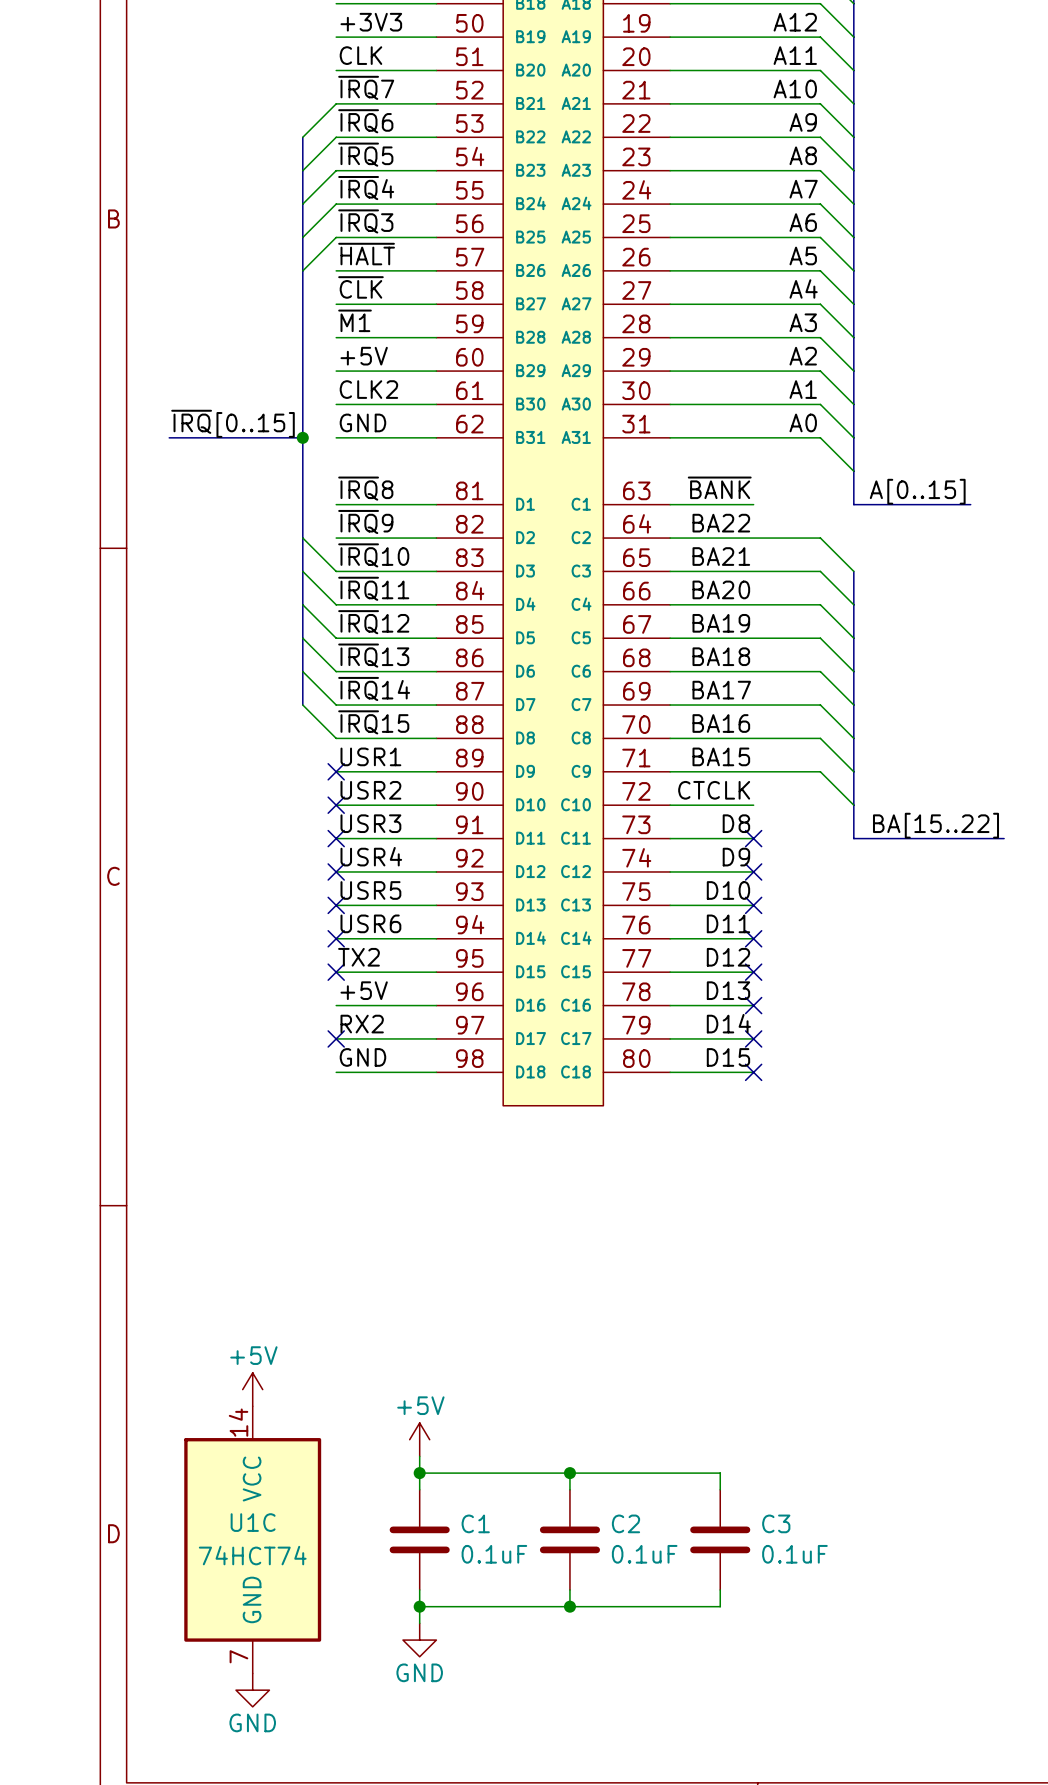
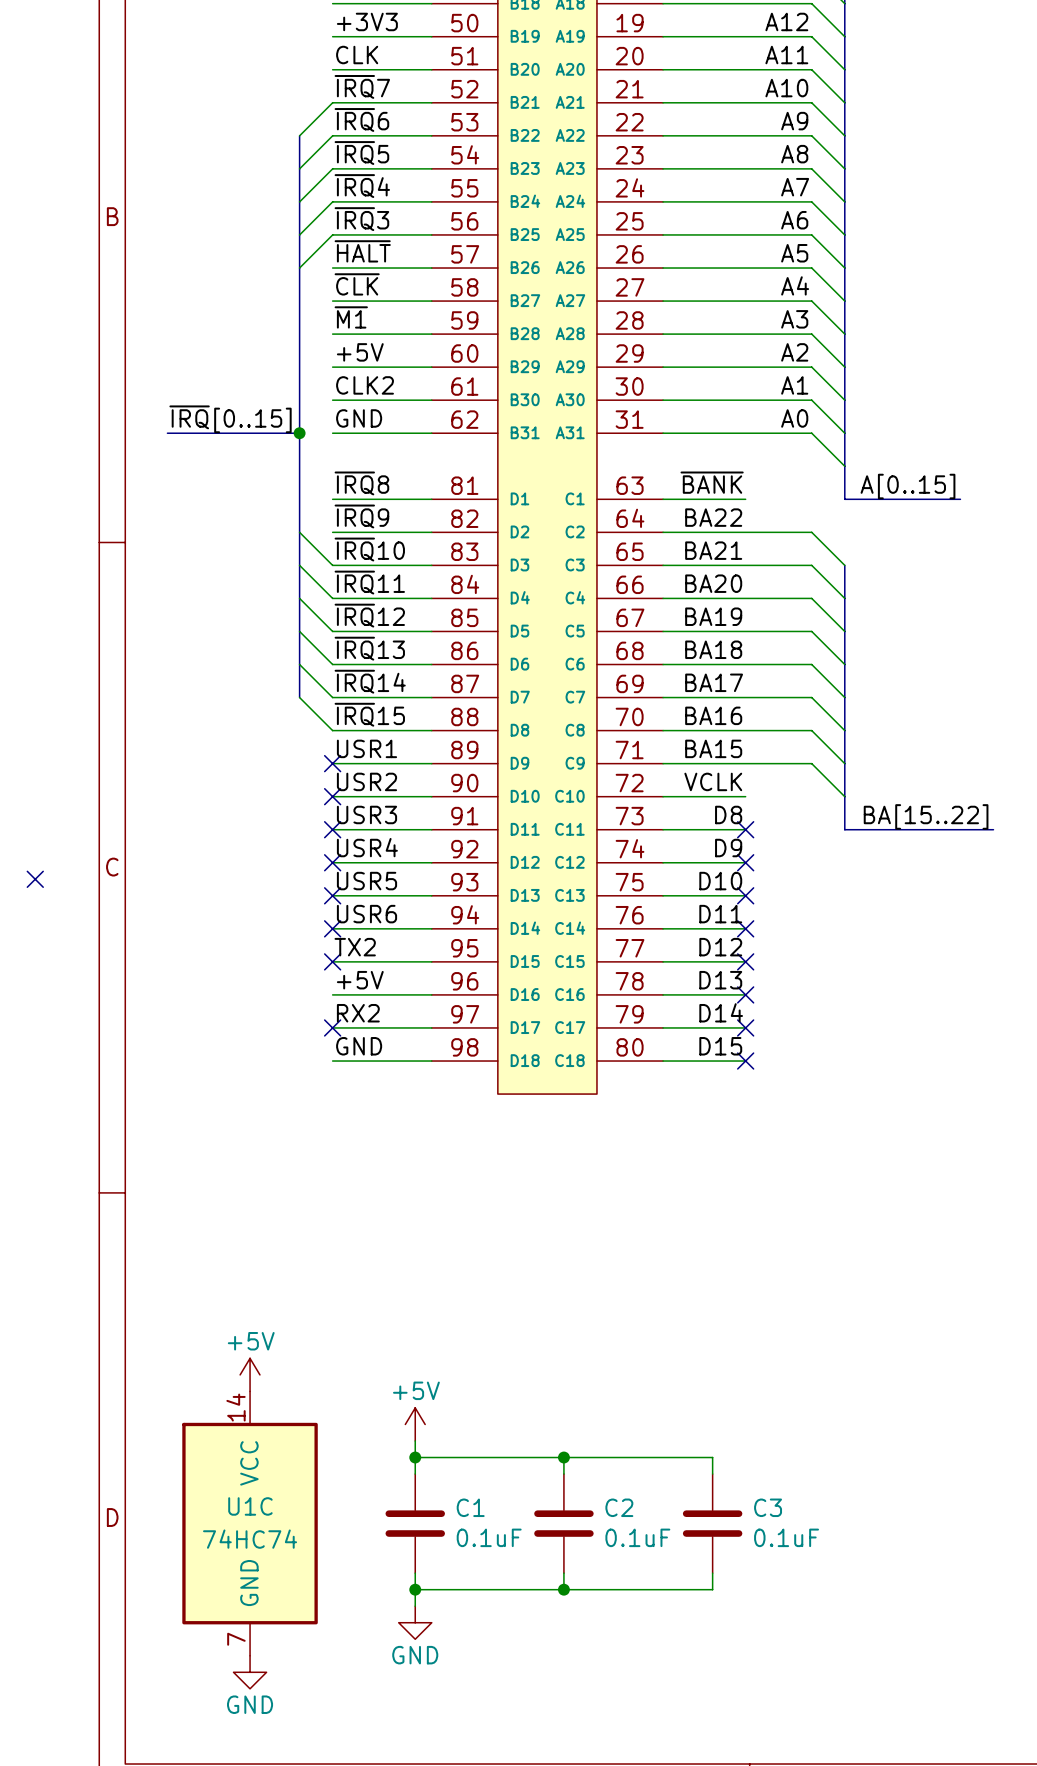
label: CTCLK (714, 790) -> VCLK (713, 781)
no-connect mark: none -> (35, 879)
U1C value: 74HCT74 (252, 1555) -> 74HC74 (250, 1539)

